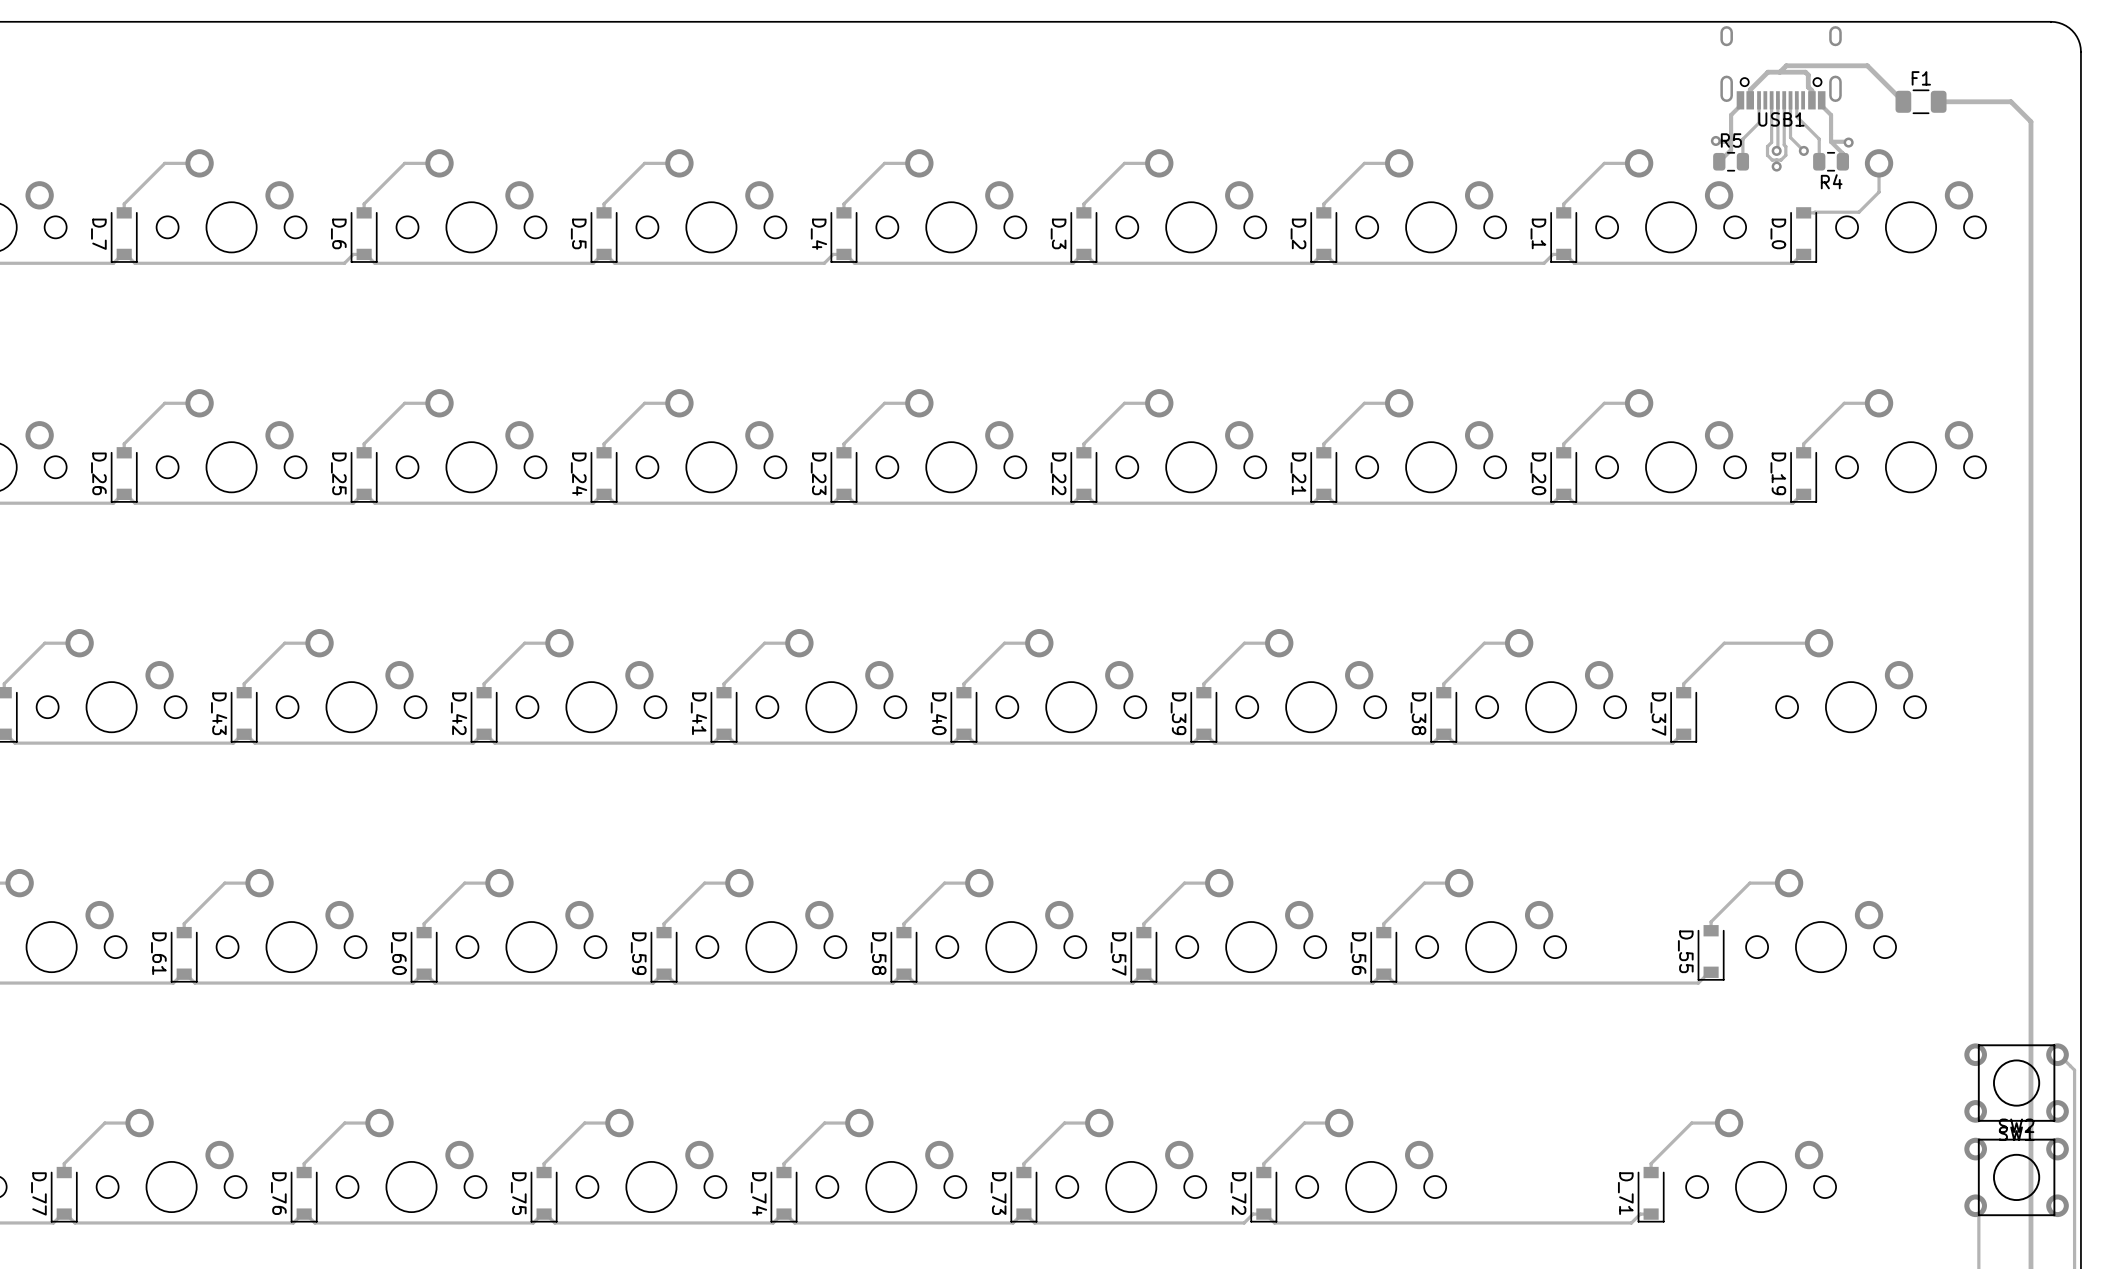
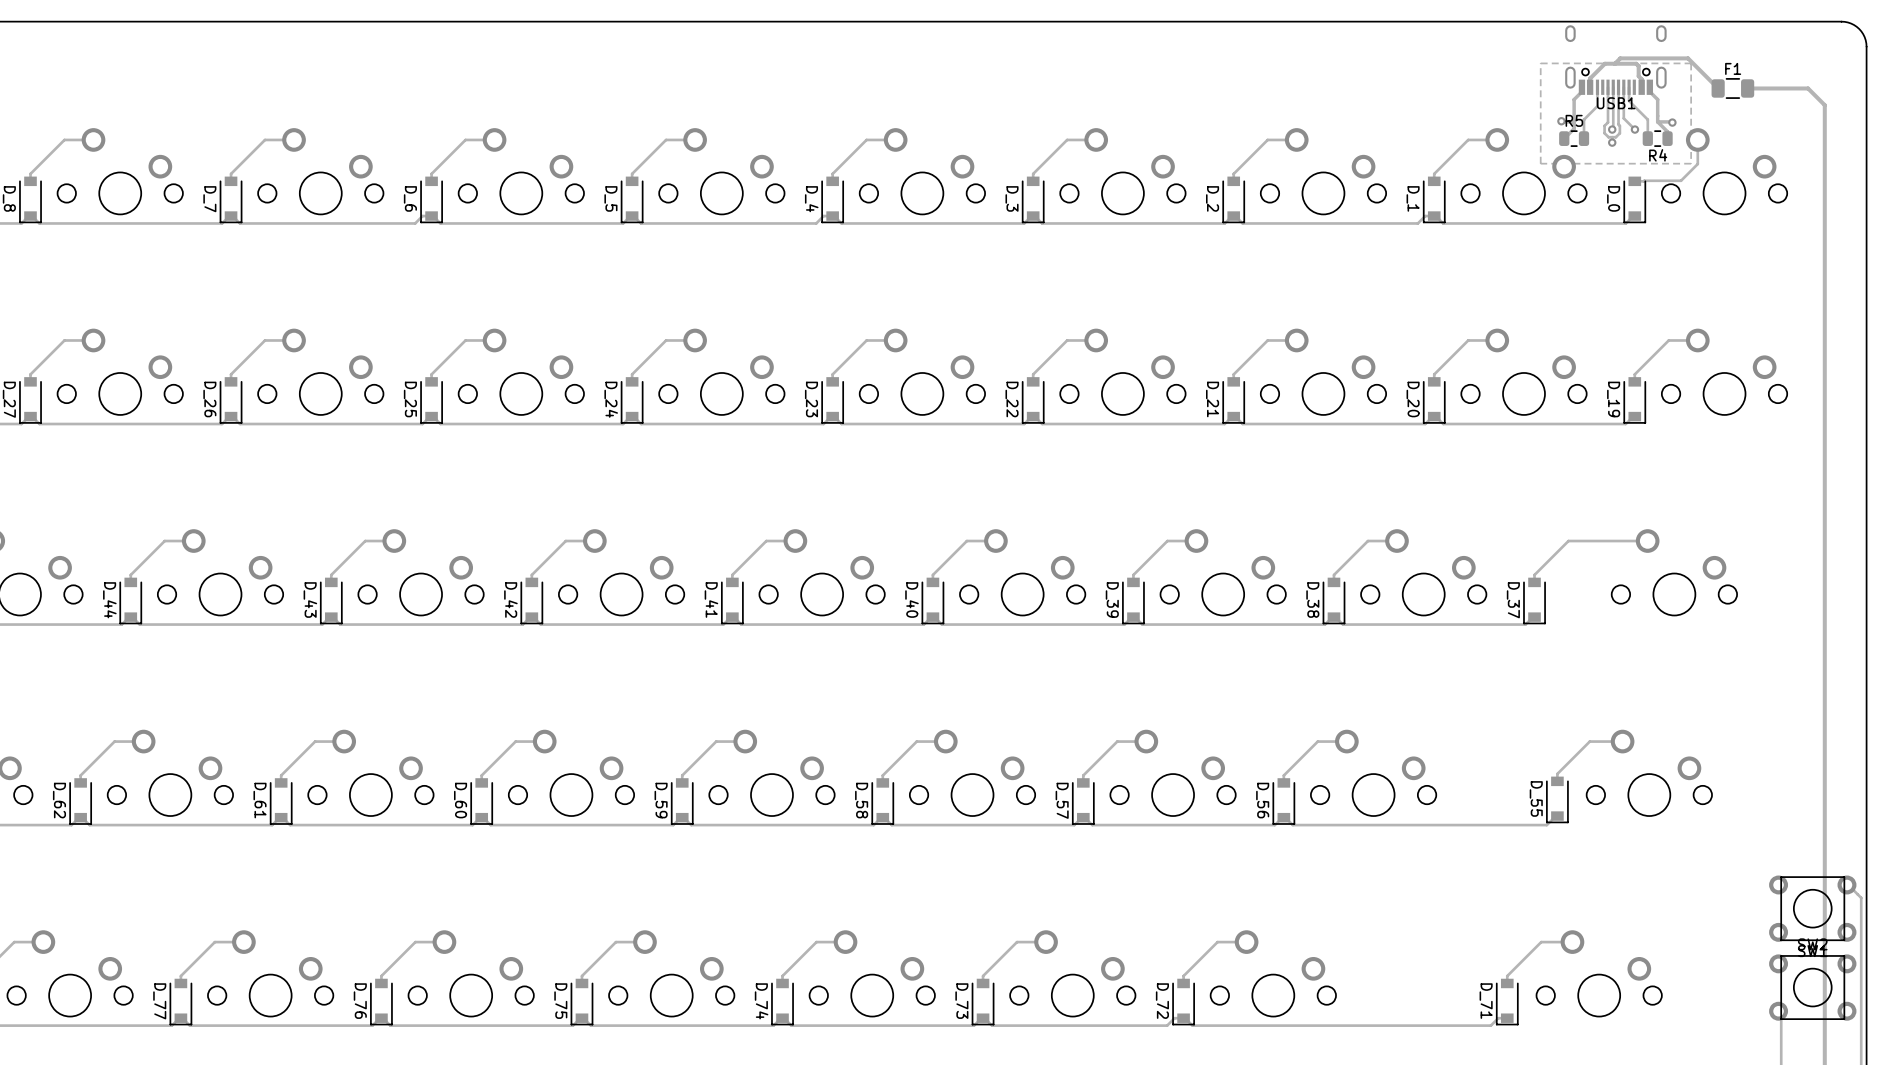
zone outline: none -> (1691, 63) (1540, 63) (1540, 163) (1691, 163) (1691, 63)

